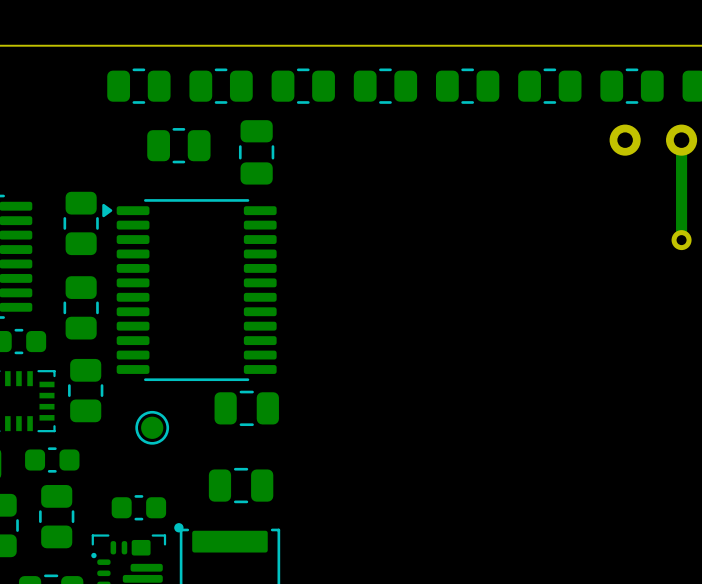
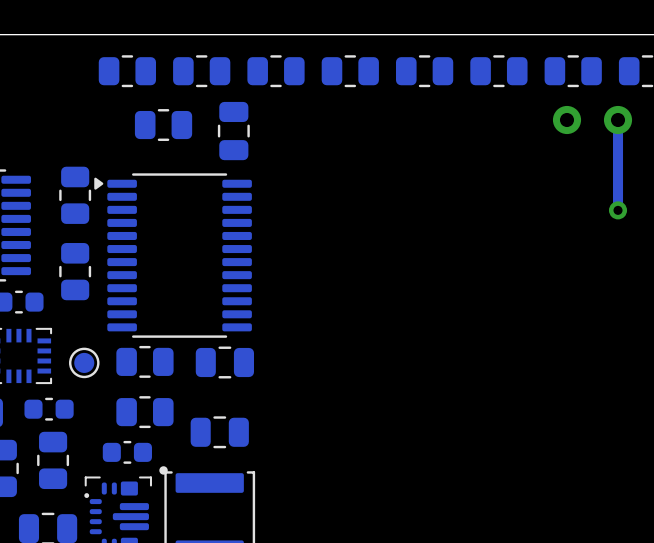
part footprint: [68, 358, 104, 423] -> [69, 347, 100, 379]
part: none -> (144, 361)
part: (152, 427) -> none
part: none -> (144, 412)

